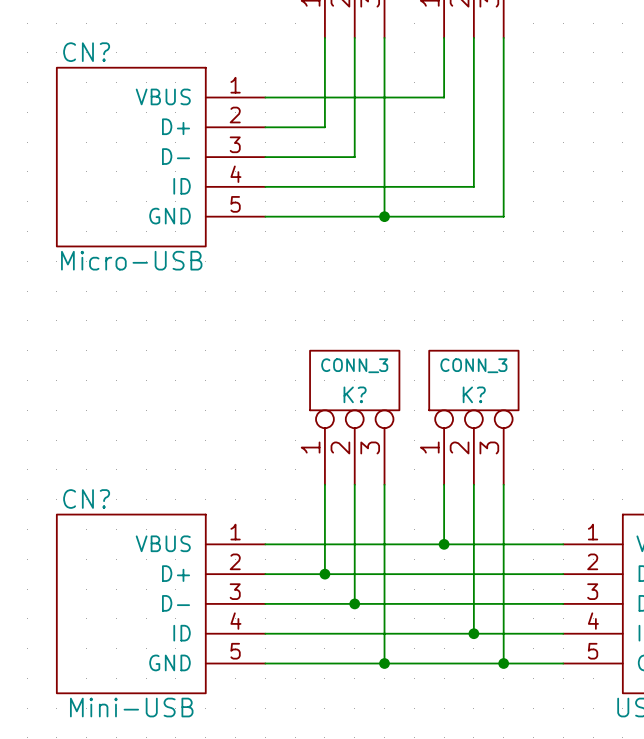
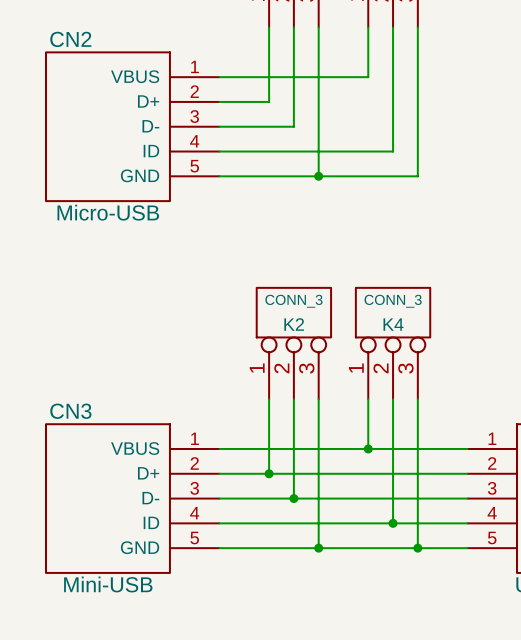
CN? name: CN? (86, 52) -> CN2 (70, 39)
K? name: K? (355, 394) -> K2 (294, 324)
K? name: K? (474, 394) -> K4 (393, 324)
CN? name: CN? (86, 499) -> CN3 (70, 411)

